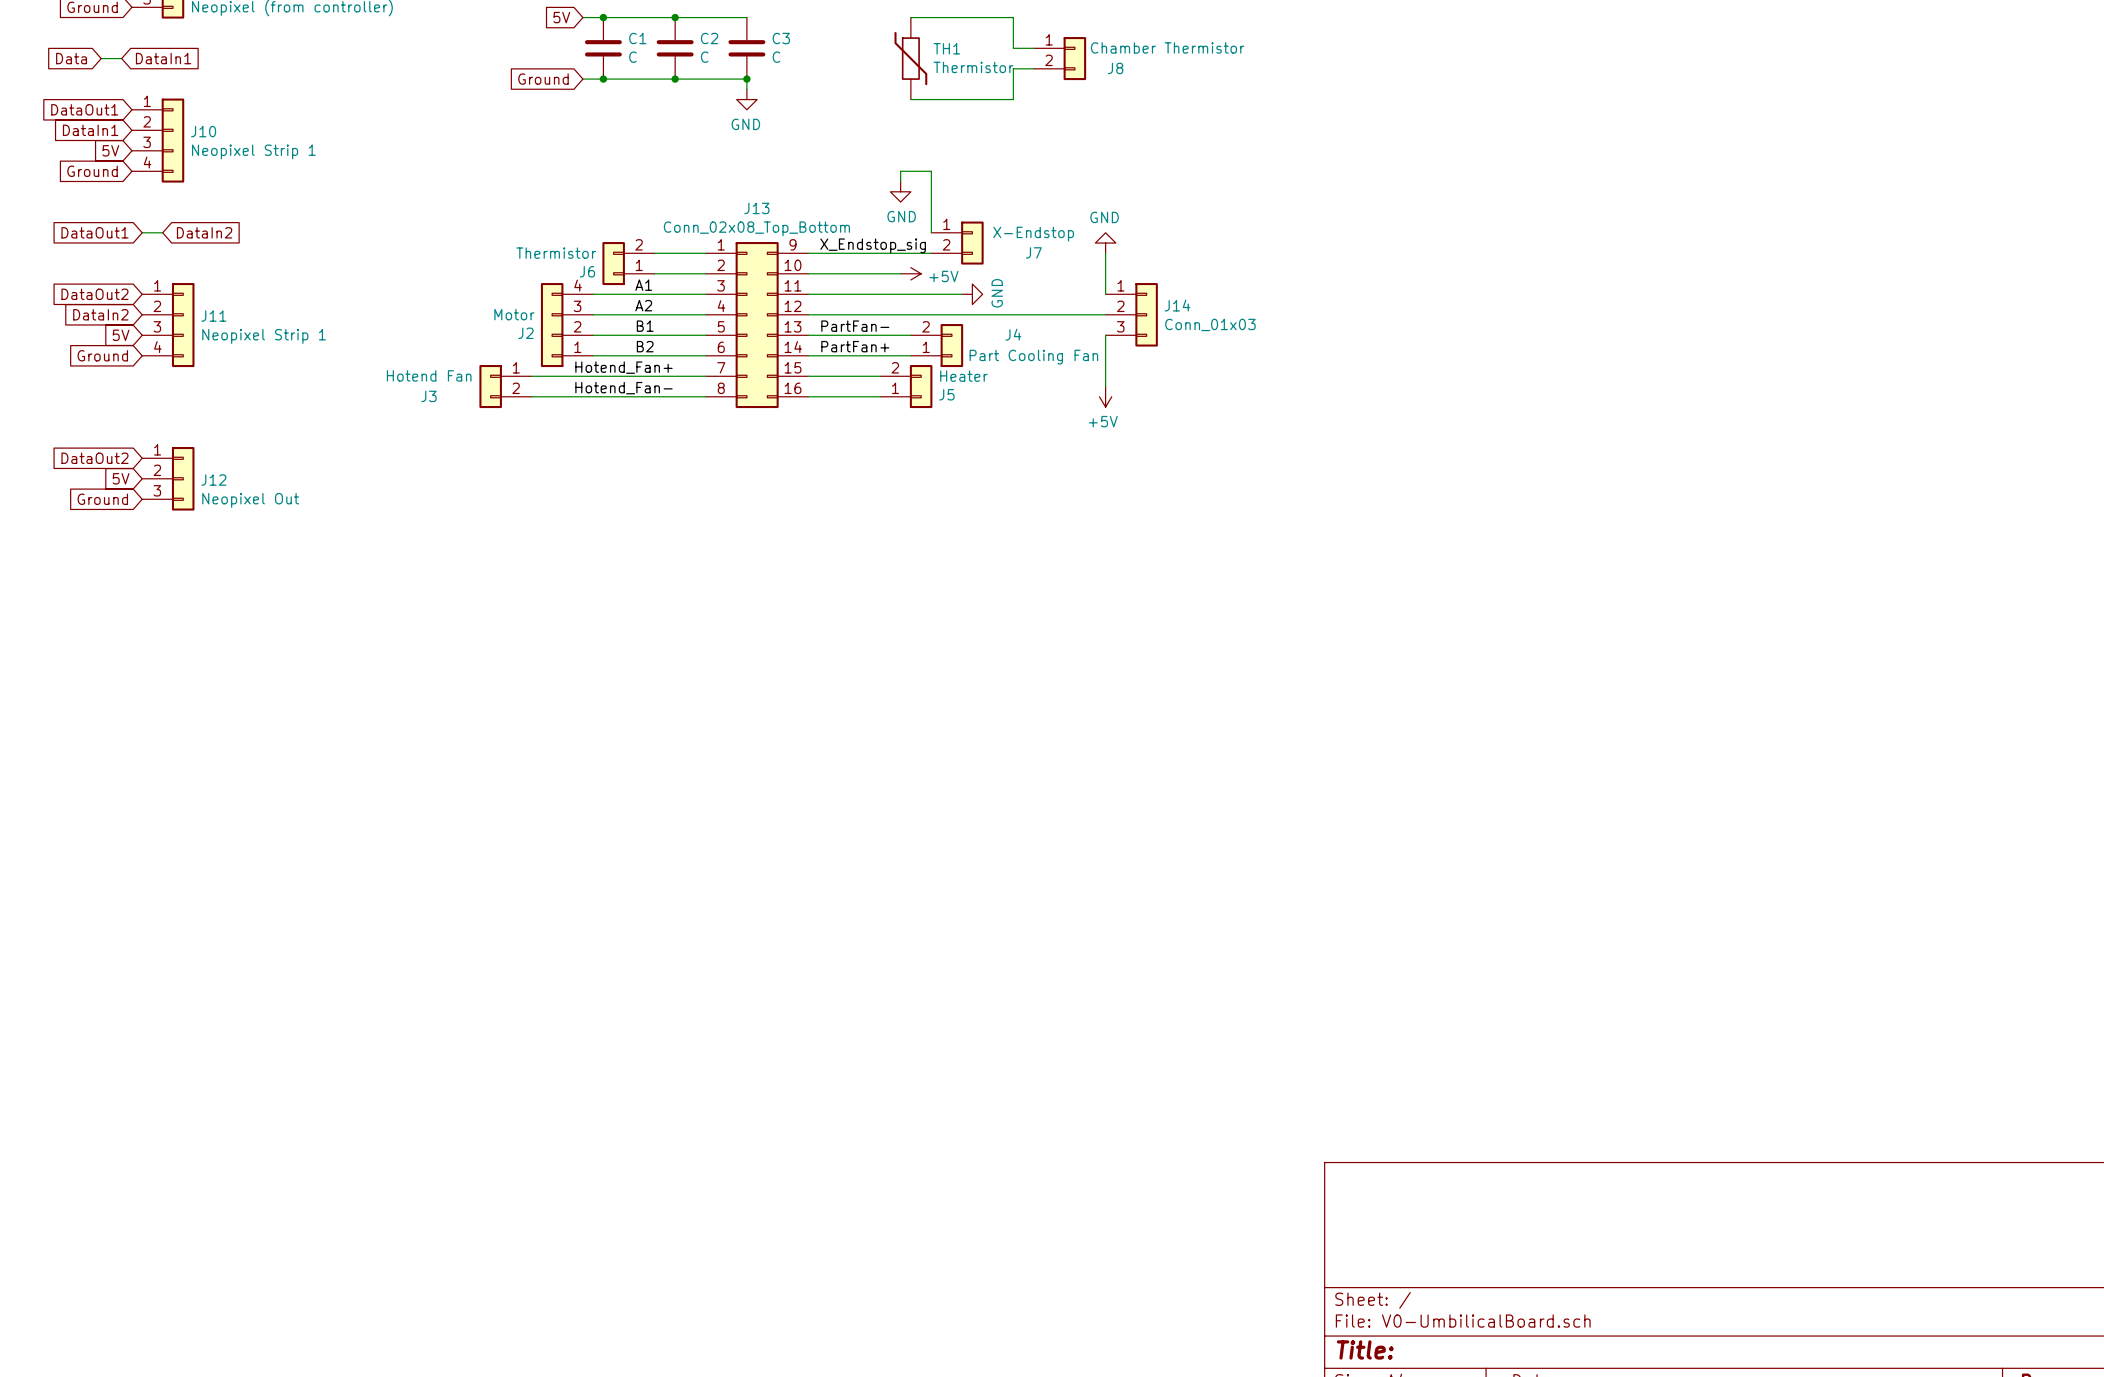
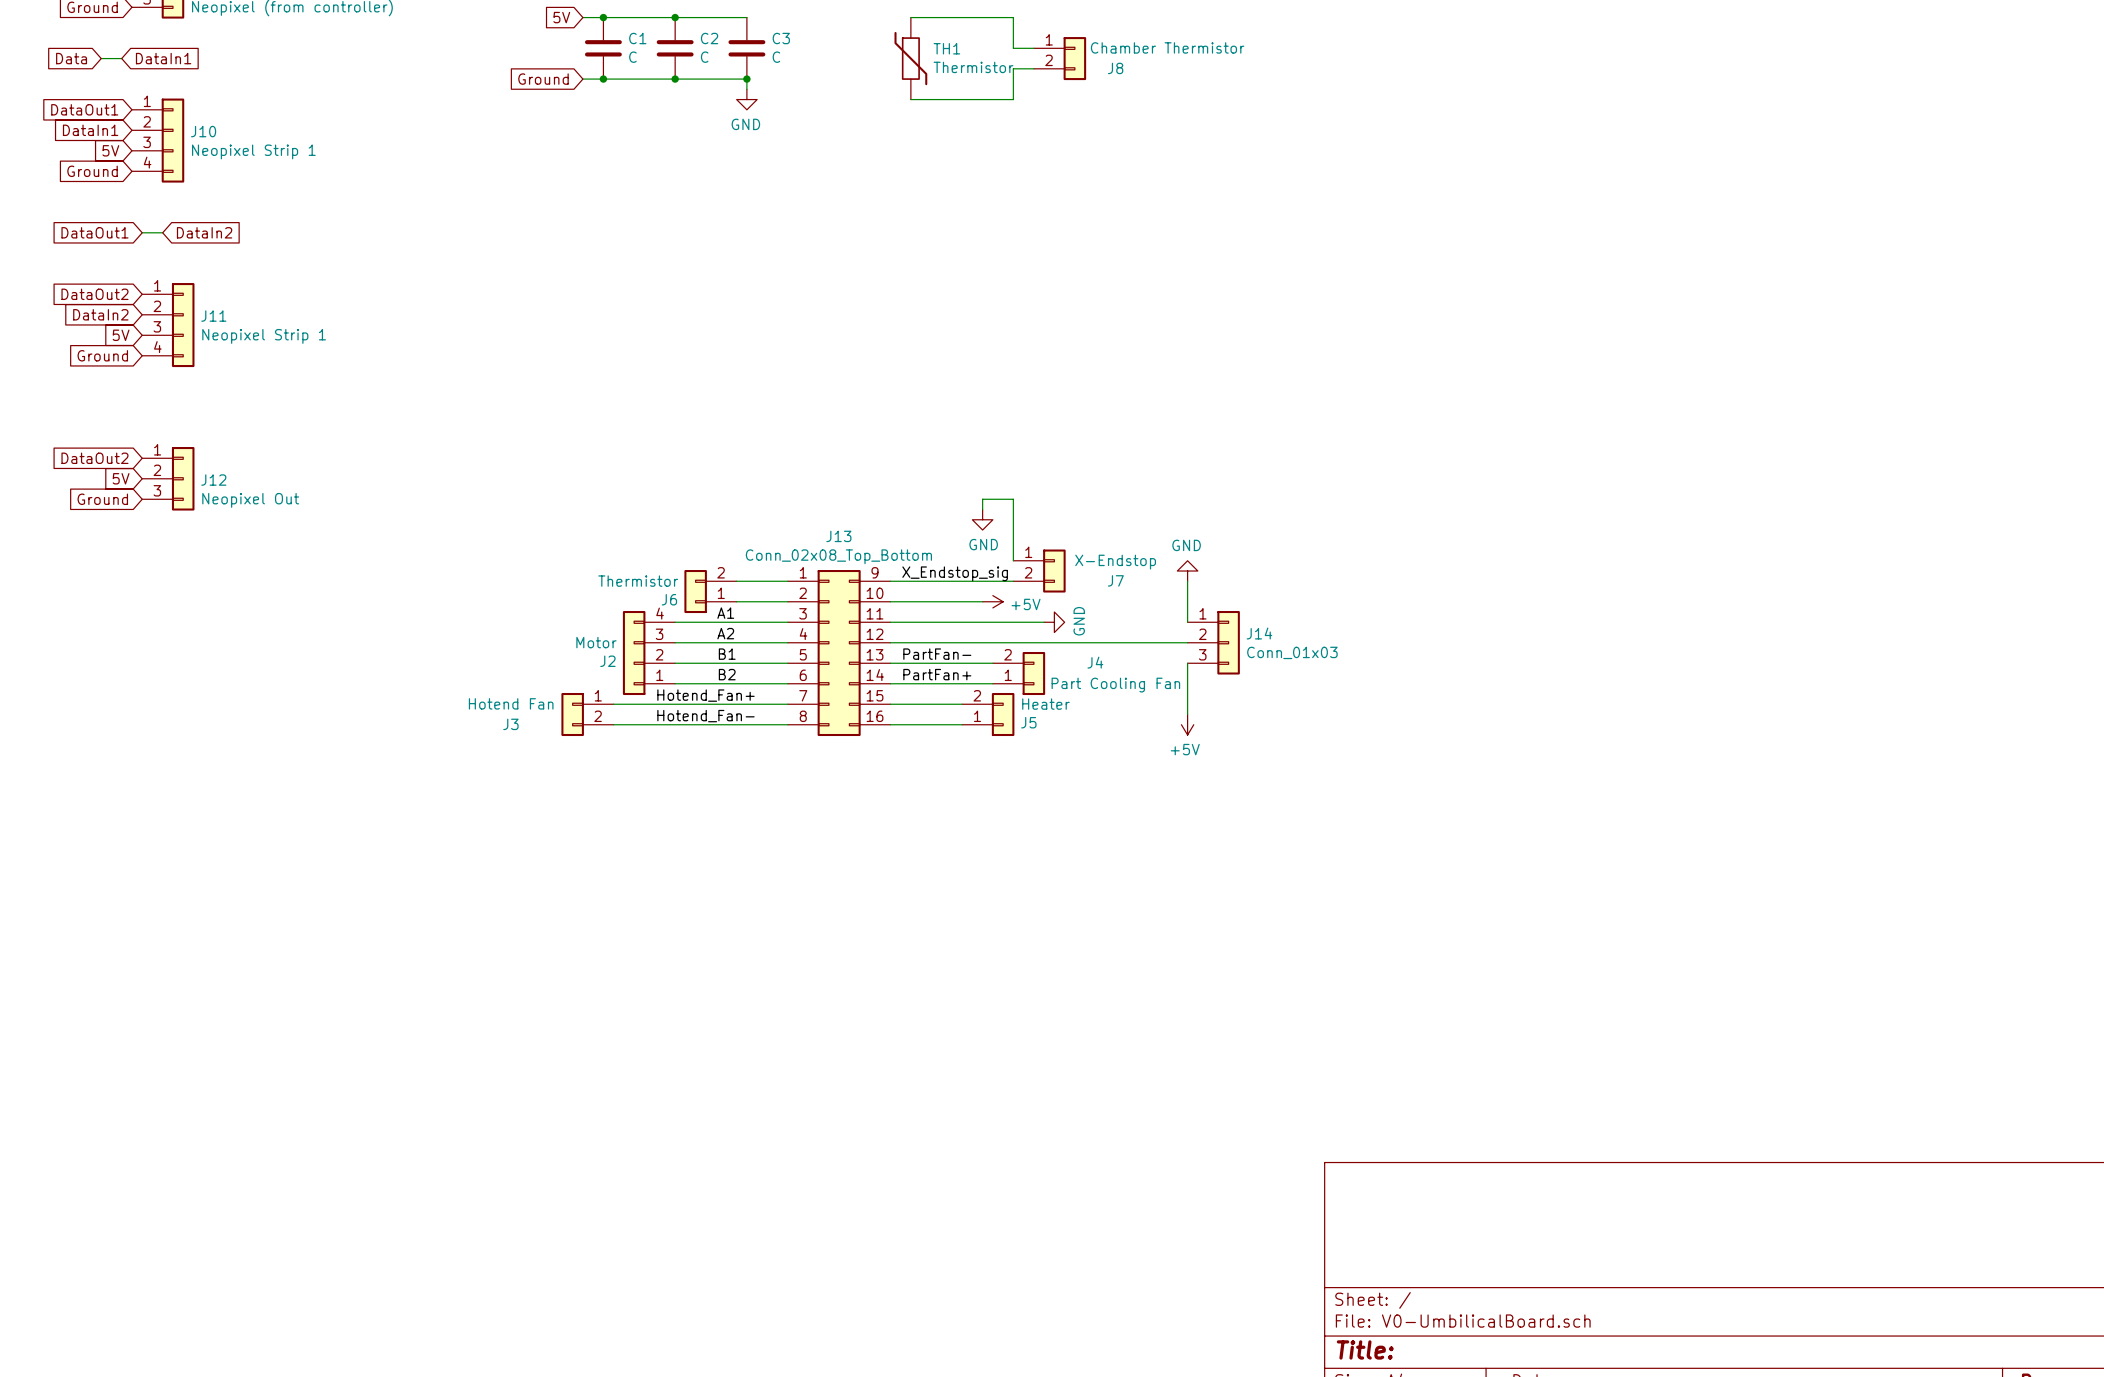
wire: (900, 181) (900, 171) (931, 171) (931, 232) -> none
power symbol: GND (900, 191) -> none
J7 position: (957, 243) -> (1039, 571)
power symbol: GND (1105, 243) -> none
label: X_Endstop_sig (873, 245) -> none
wire: (654, 253) (705, 253) -> none
wire: (808, 253) (931, 253) -> none
wire: (1105, 253) (1105, 294) -> none
J6 position: (628, 263) -> (710, 591)
wire: (654, 273) (705, 273) -> none
wire: (808, 273) (900, 273) -> none
power symbol: +5V (910, 273) -> none
label: A1 (643, 285) -> none
wire: (593, 294) (705, 294) -> none
wire: (808, 294) (962, 294) -> none
power symbol: GND (972, 294) -> none
label: A2 (643, 305) -> none
wire: (593, 314) (705, 314) -> none
wire: (808, 314) (1105, 314) -> none
J14 position: (1131, 314) -> (1213, 642)
J2 position: (567, 325) -> (649, 653)
J13 position: (757, 325) -> (839, 653)
label: B1 (645, 326) -> none
label: PartFan- (855, 326) -> none
wire: (593, 335) (705, 335) -> none
wire: (808, 335) (910, 335) -> none
wire: (1105, 335) (1105, 386) -> none
J4 position: (937, 345) -> (1019, 673)
label: B2 (645, 346) -> none
label: PartFan+ (855, 346) -> none
wire: (593, 355) (705, 355) -> none
wire: (808, 355) (910, 355) -> none
label: Hotend_Fan+ (623, 367) -> none
wire: (531, 376) (705, 376) -> none
wire: (808, 376) (880, 376) -> none
J3 position: (505, 386) -> (587, 714)
J5 position: (906, 386) -> (988, 714)
label: Hotend_Fan- (623, 388) -> none
wire: (531, 396) (705, 396) -> none
wire: (808, 396) (880, 396) -> none
power symbol: +5V (1105, 396) -> none
wire: none -> (982, 509) (982, 499) (1013, 499) (1013, 560)
power symbol: none -> GND (982, 519)
power symbol: none -> GND (1187, 571)
label: none -> X_Endstop_sig (955, 573)
wire: none -> (736, 581) (787, 581)
wire: none -> (890, 581) (1013, 581)
wire: none -> (1187, 581) (1187, 622)
wire: none -> (736, 601) (787, 601)
wire: none -> (890, 601) (982, 601)
power symbol: none -> +5V (992, 601)
label: none -> A1 (725, 613)
wire: none -> (675, 622) (787, 622)
wire: none -> (890, 622) (1044, 622)
power symbol: none -> GND (1054, 622)
label: none -> A2 (725, 633)
wire: none -> (675, 642) (787, 642)
wire: none -> (890, 642) (1187, 642)
label: none -> B1 (727, 654)
label: none -> PartFan- (937, 654)
wire: none -> (675, 663) (787, 663)
wire: none -> (890, 663) (992, 663)
wire: none -> (1187, 663) (1187, 714)
label: none -> B2 (727, 674)
label: none -> PartFan+ (937, 674)
wire: none -> (675, 683) (787, 683)
wire: none -> (890, 683) (992, 683)
label: none -> Hotend_Fan+ (705, 695)
wire: none -> (613, 704) (787, 704)
wire: none -> (890, 704) (962, 704)
label: none -> Hotend_Fan- (705, 716)
wire: none -> (613, 724) (787, 724)
wire: none -> (890, 724) (962, 724)
power symbol: none -> +5V (1187, 724)

